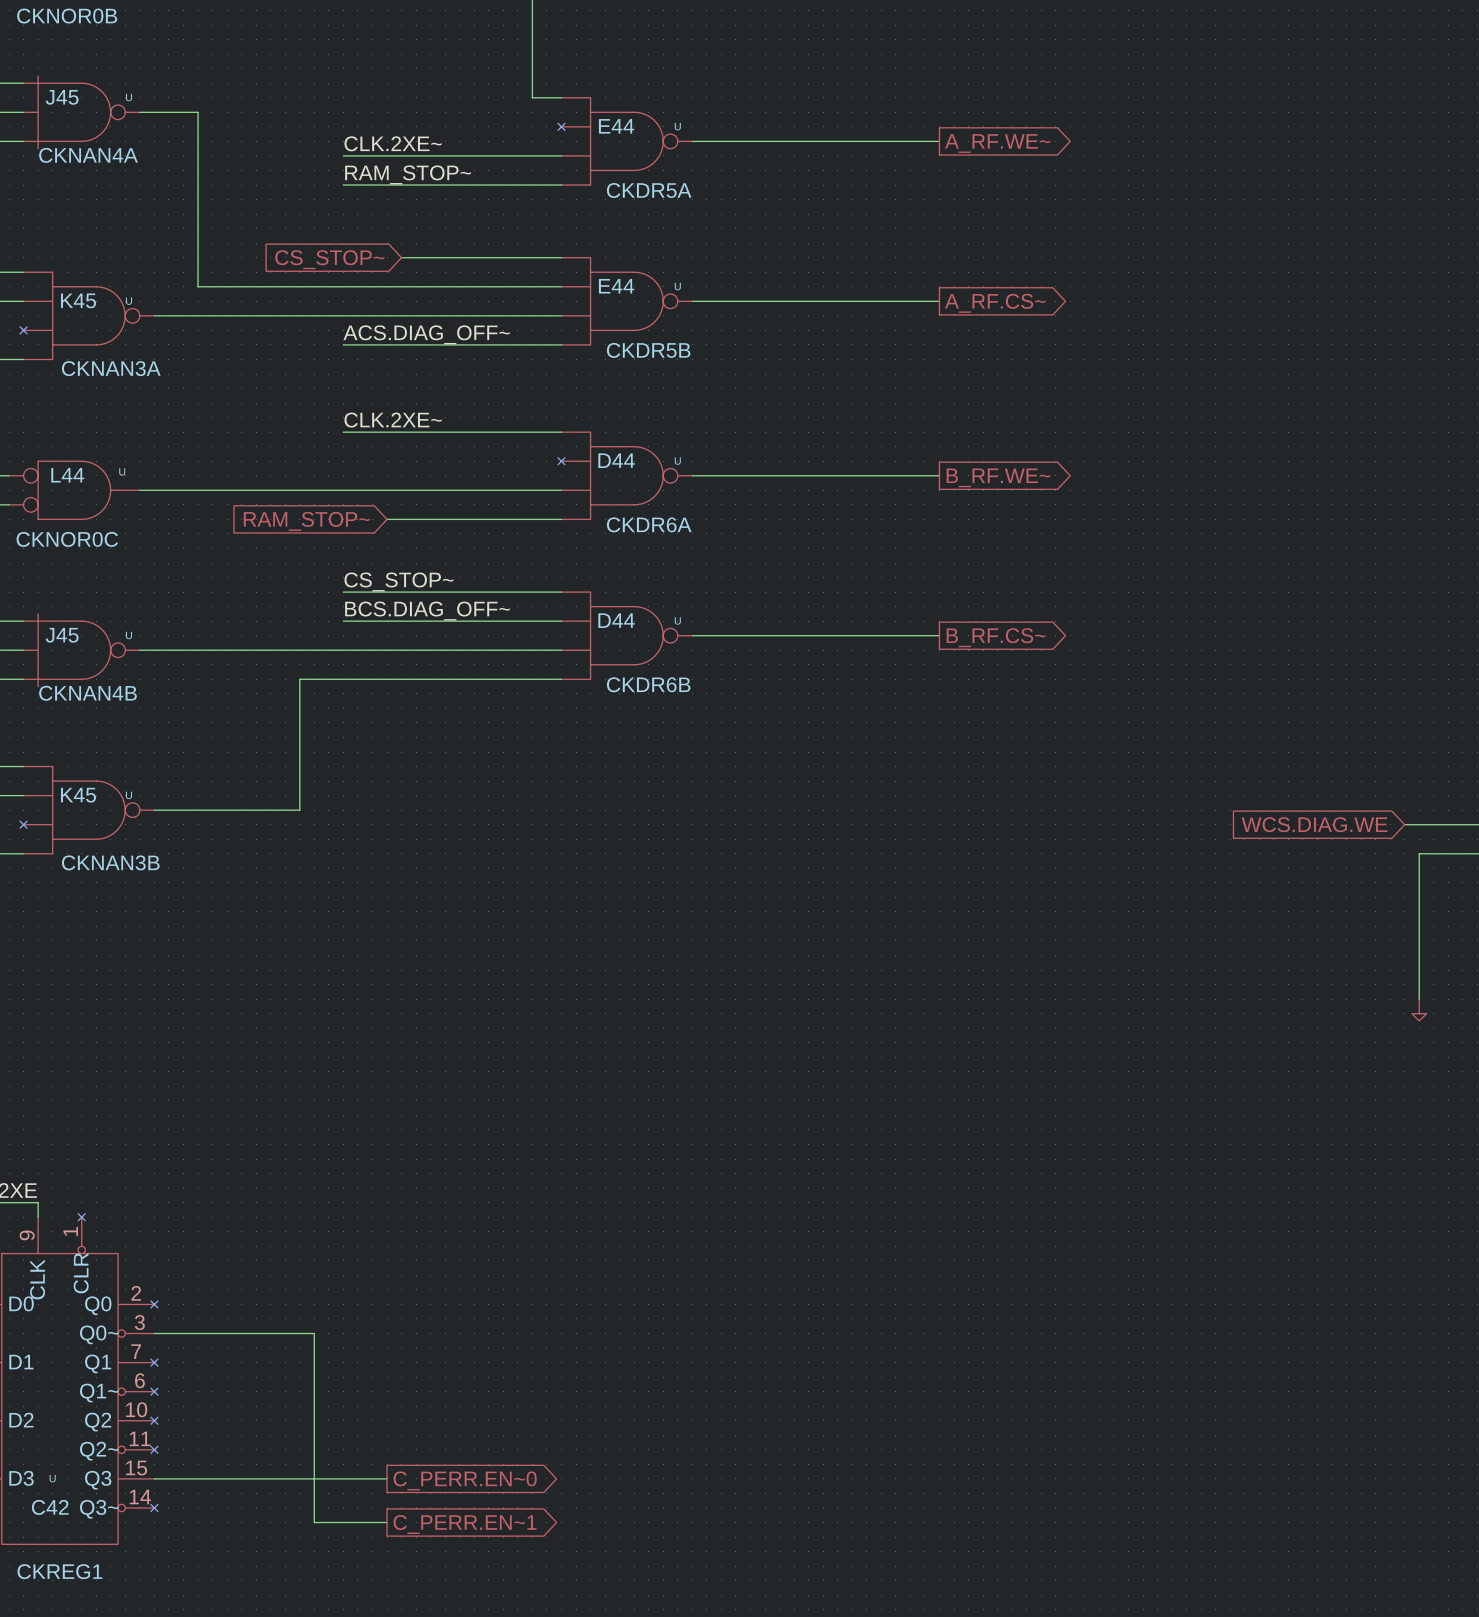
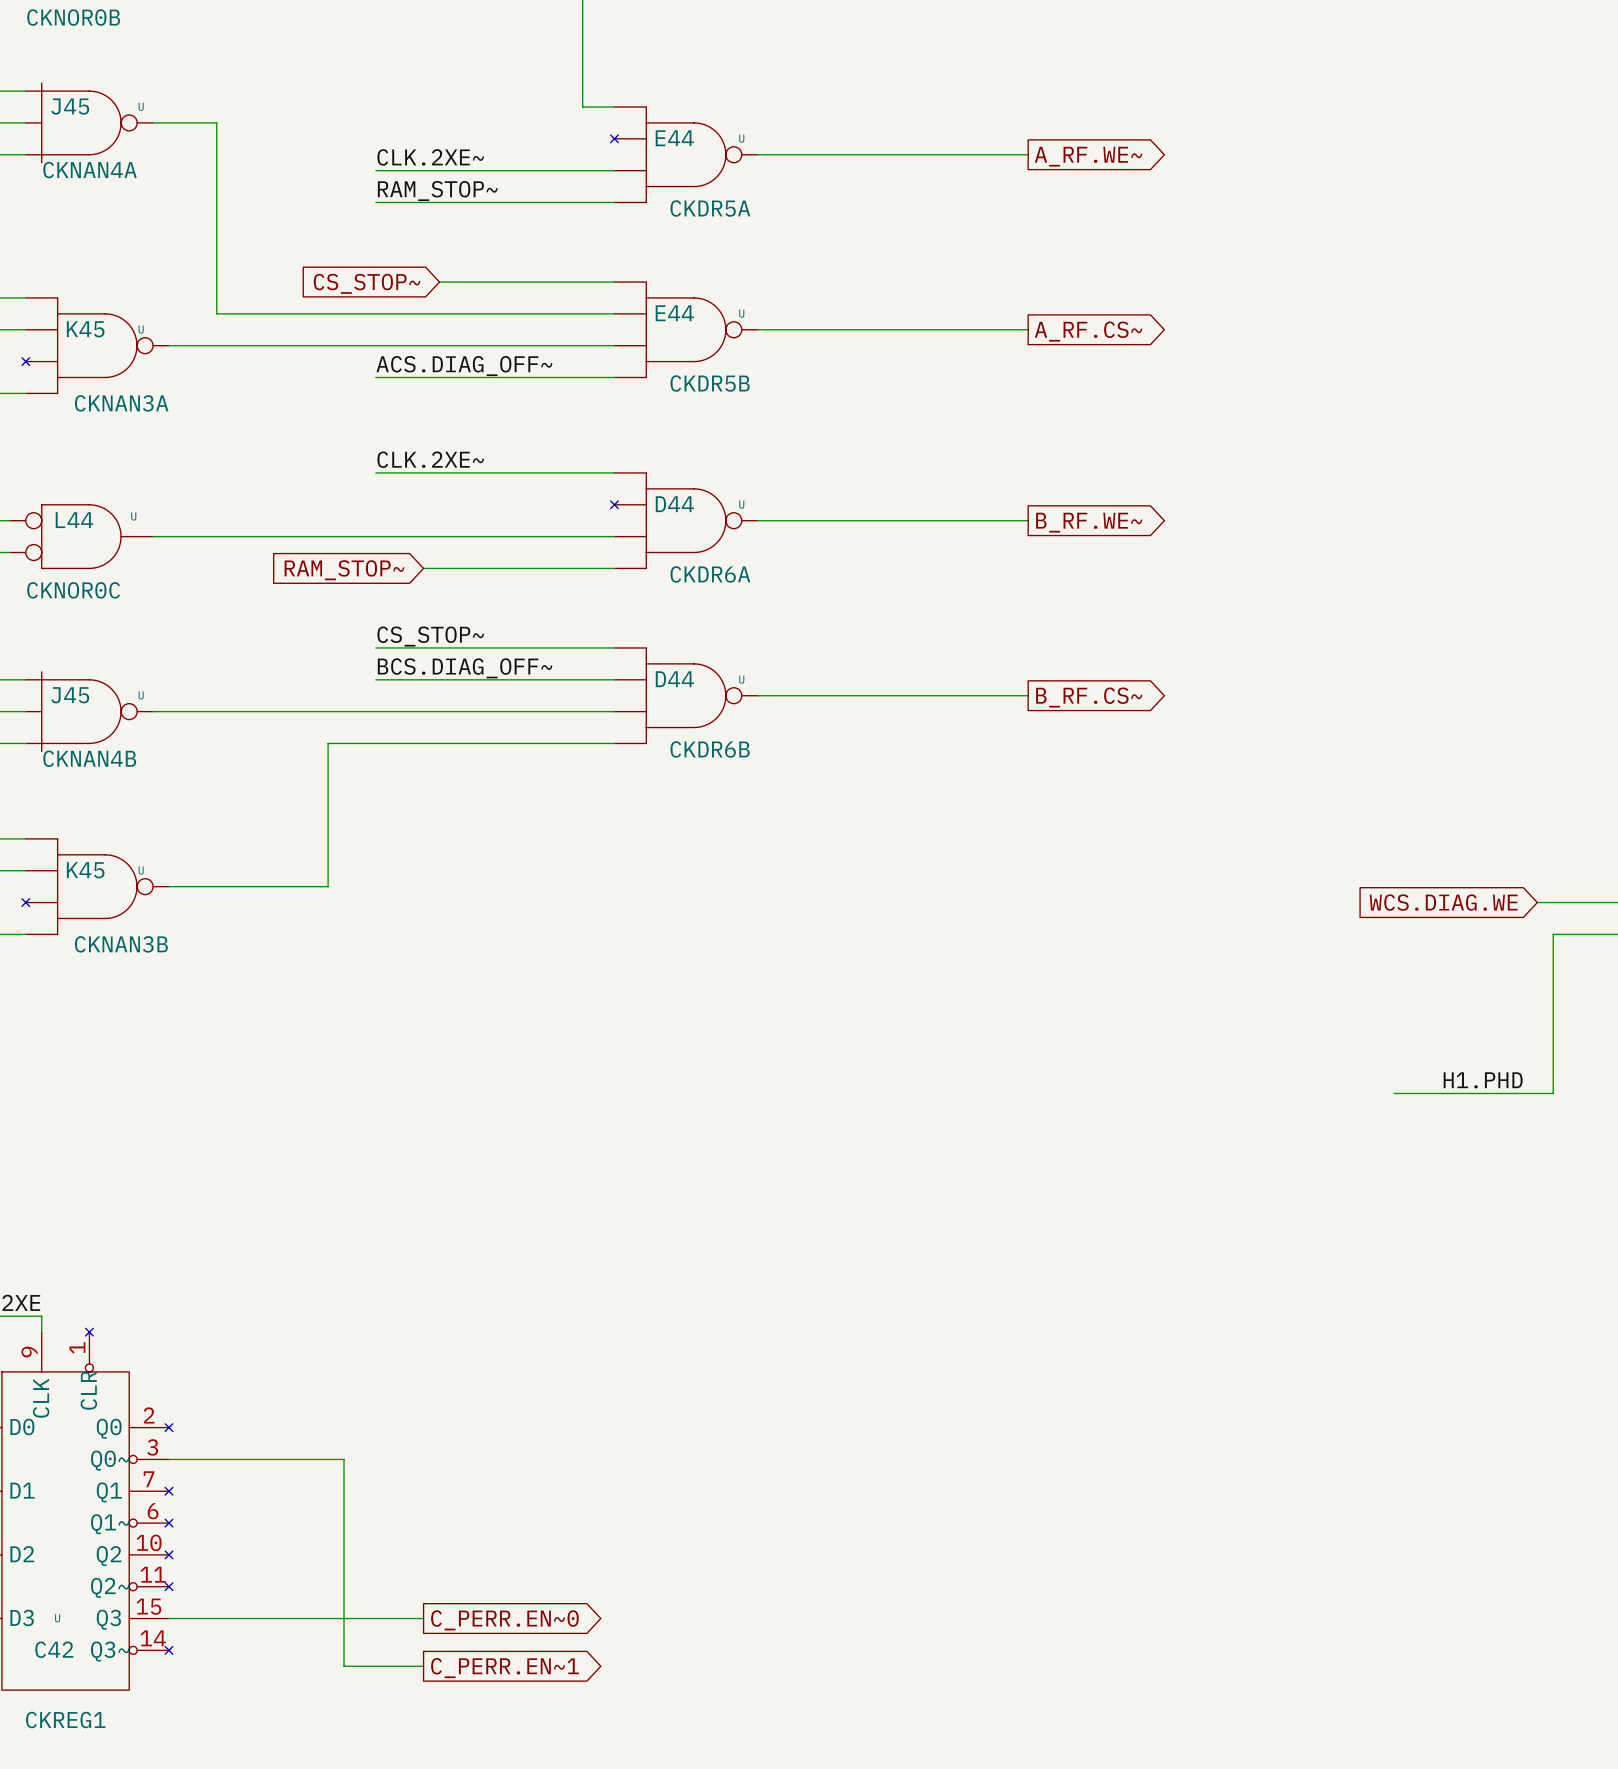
label: none -> H1.PHD (1483, 1080)
wire: none -> (1394, 1093) (1553, 1093)
power symbol: (1419, 1010) -> none

